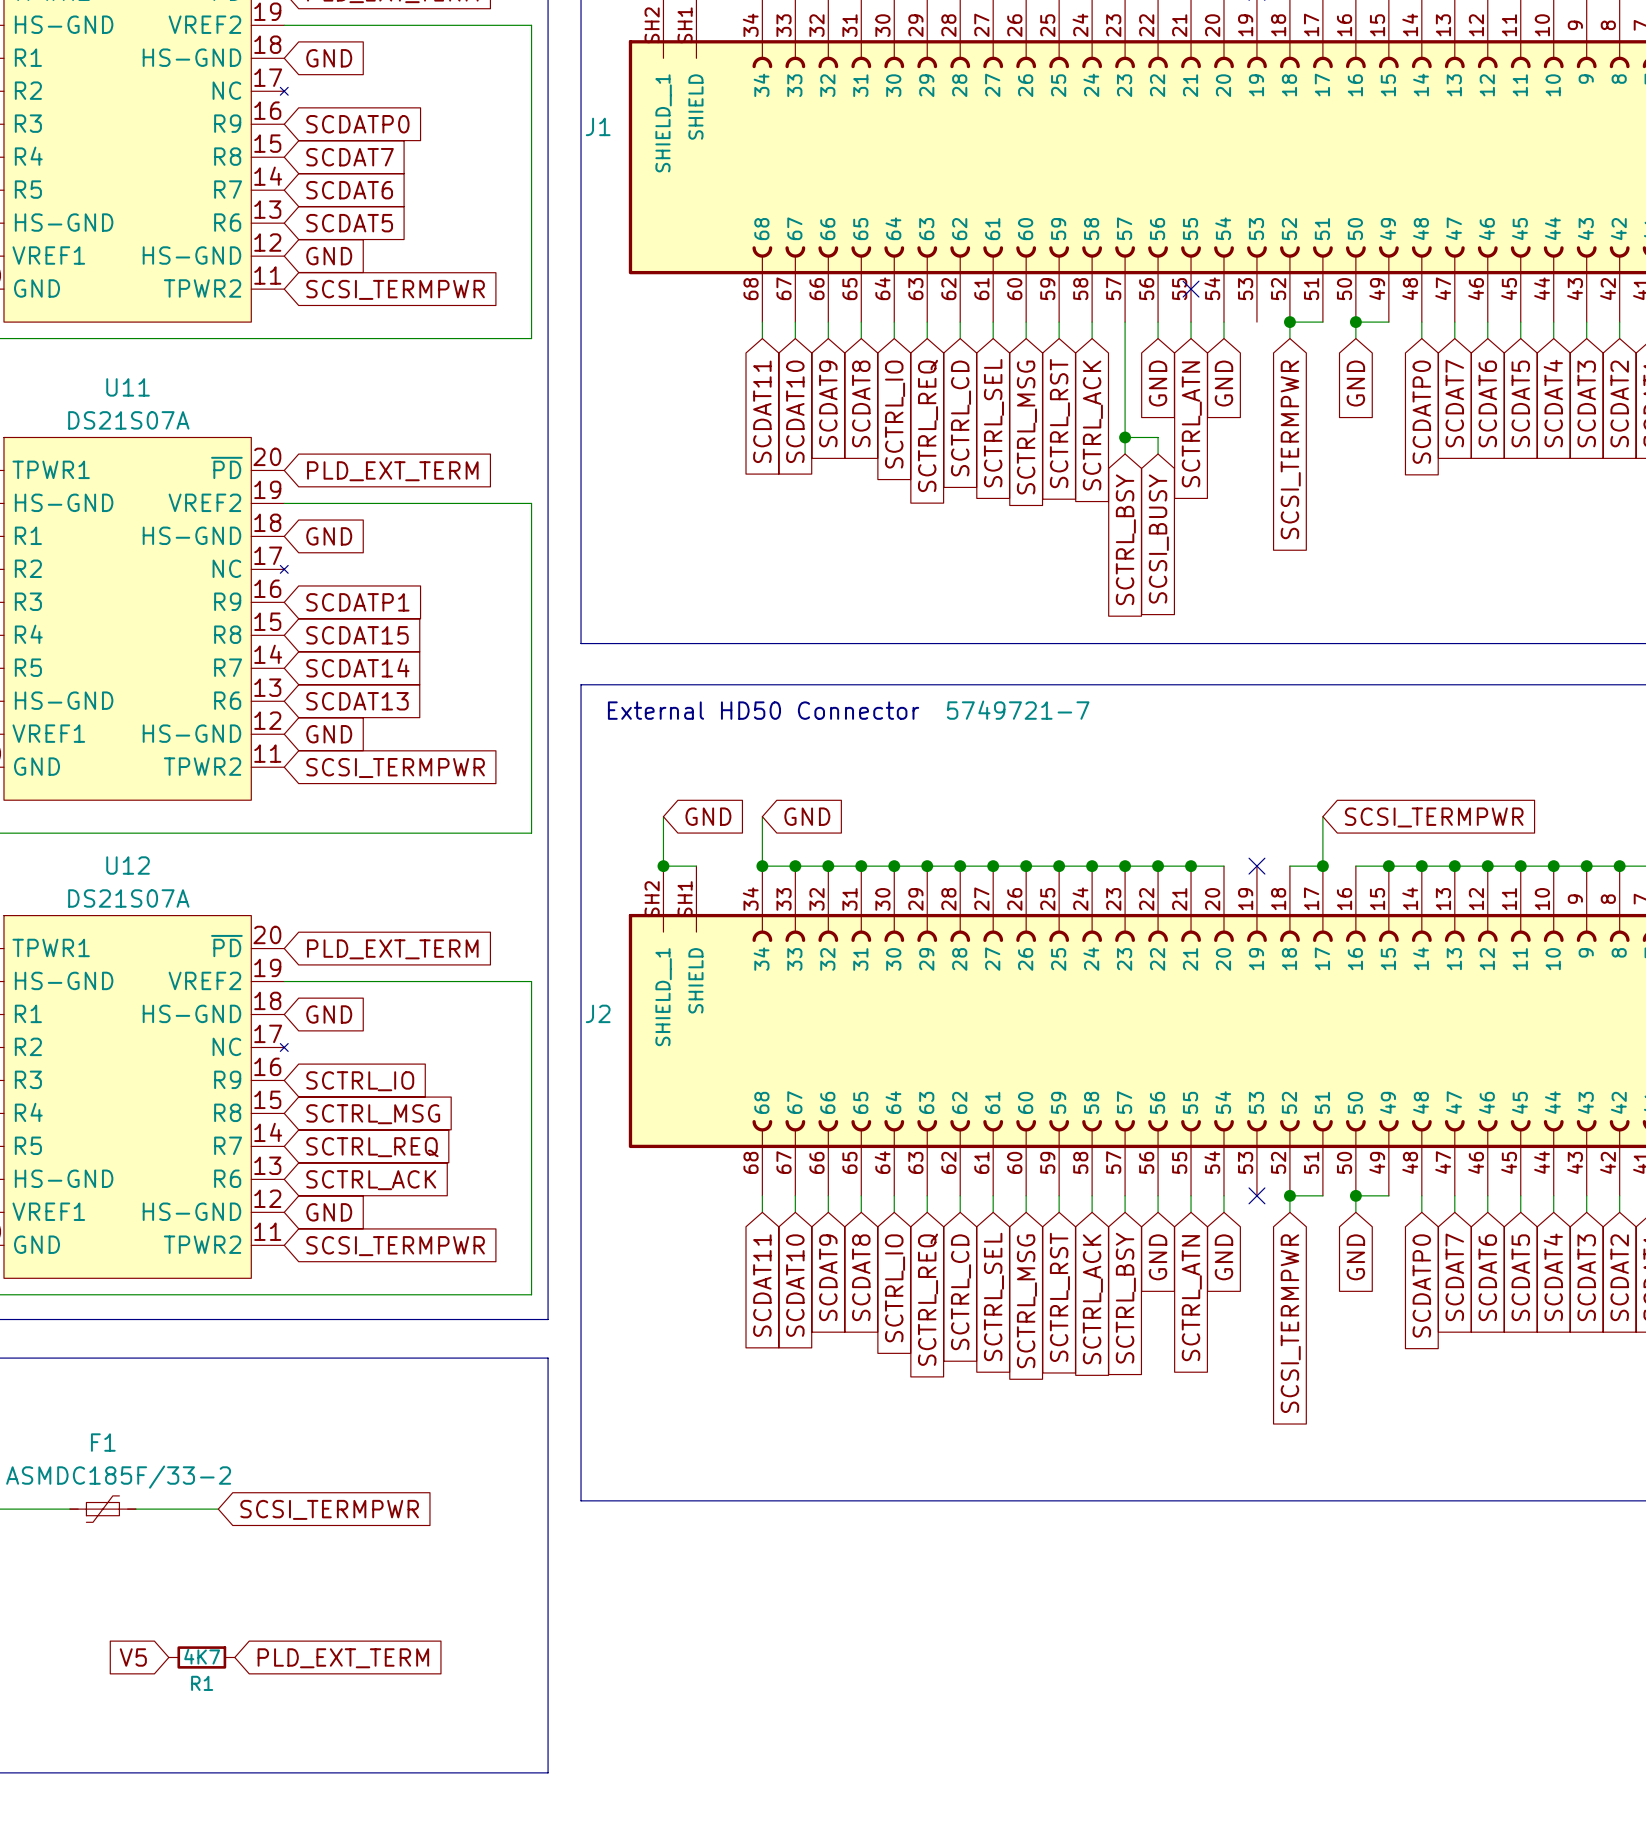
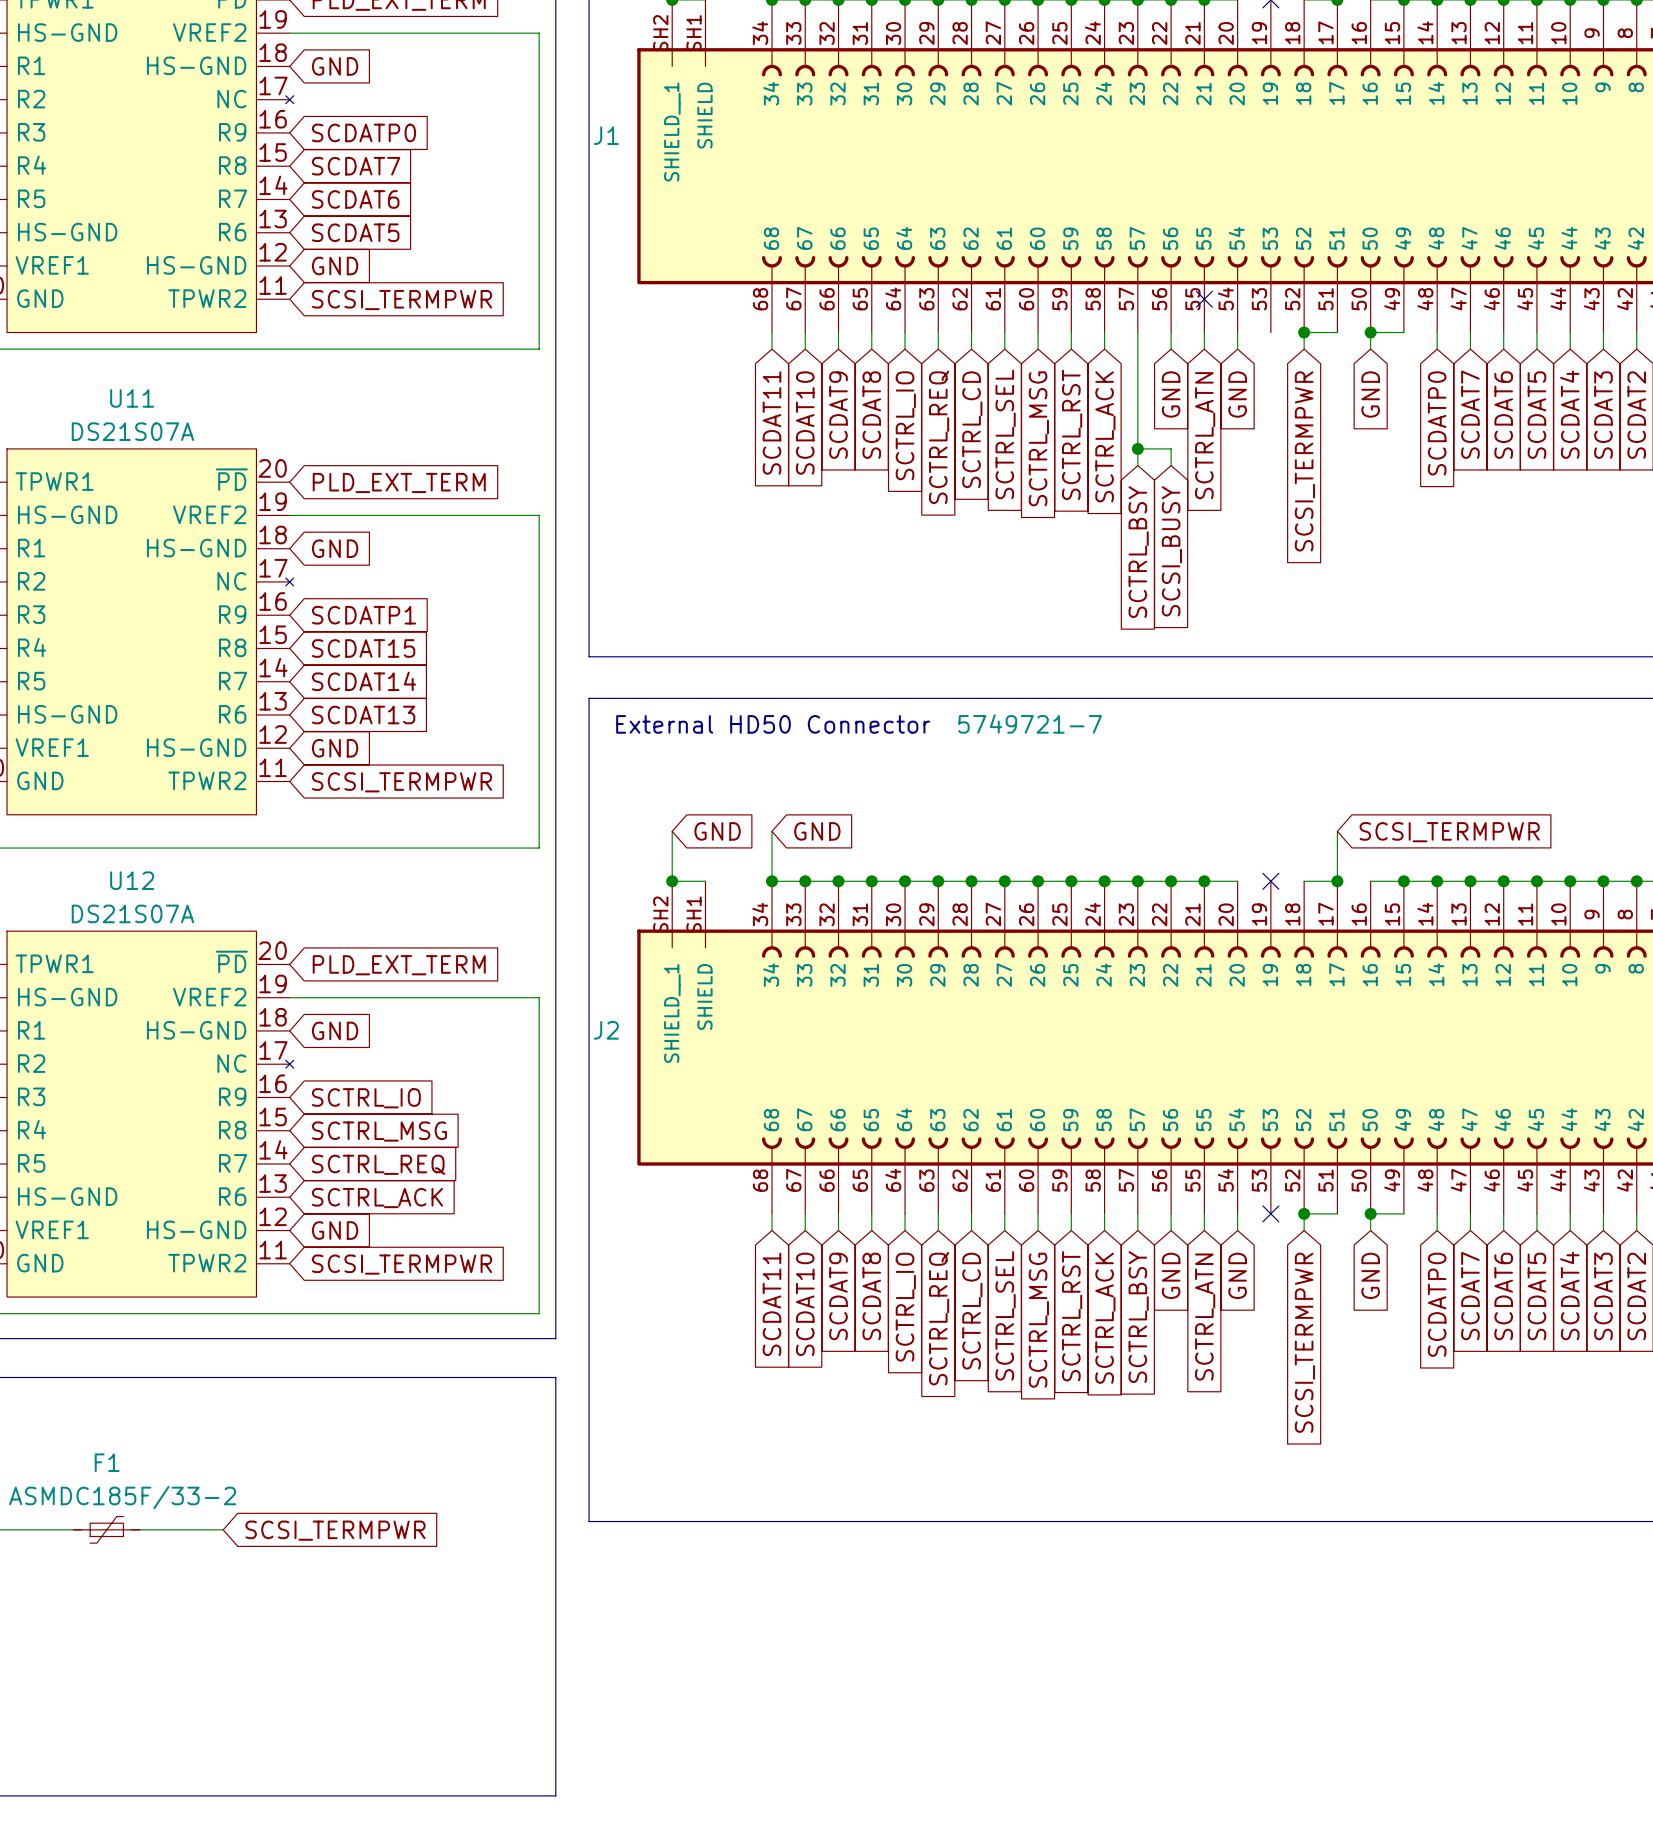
global label: V5 (133, 1657) -> none
R1: 4K7 (201, 1657) -> none
global label: PLD_EXT_TERM (343, 1658) -> none

